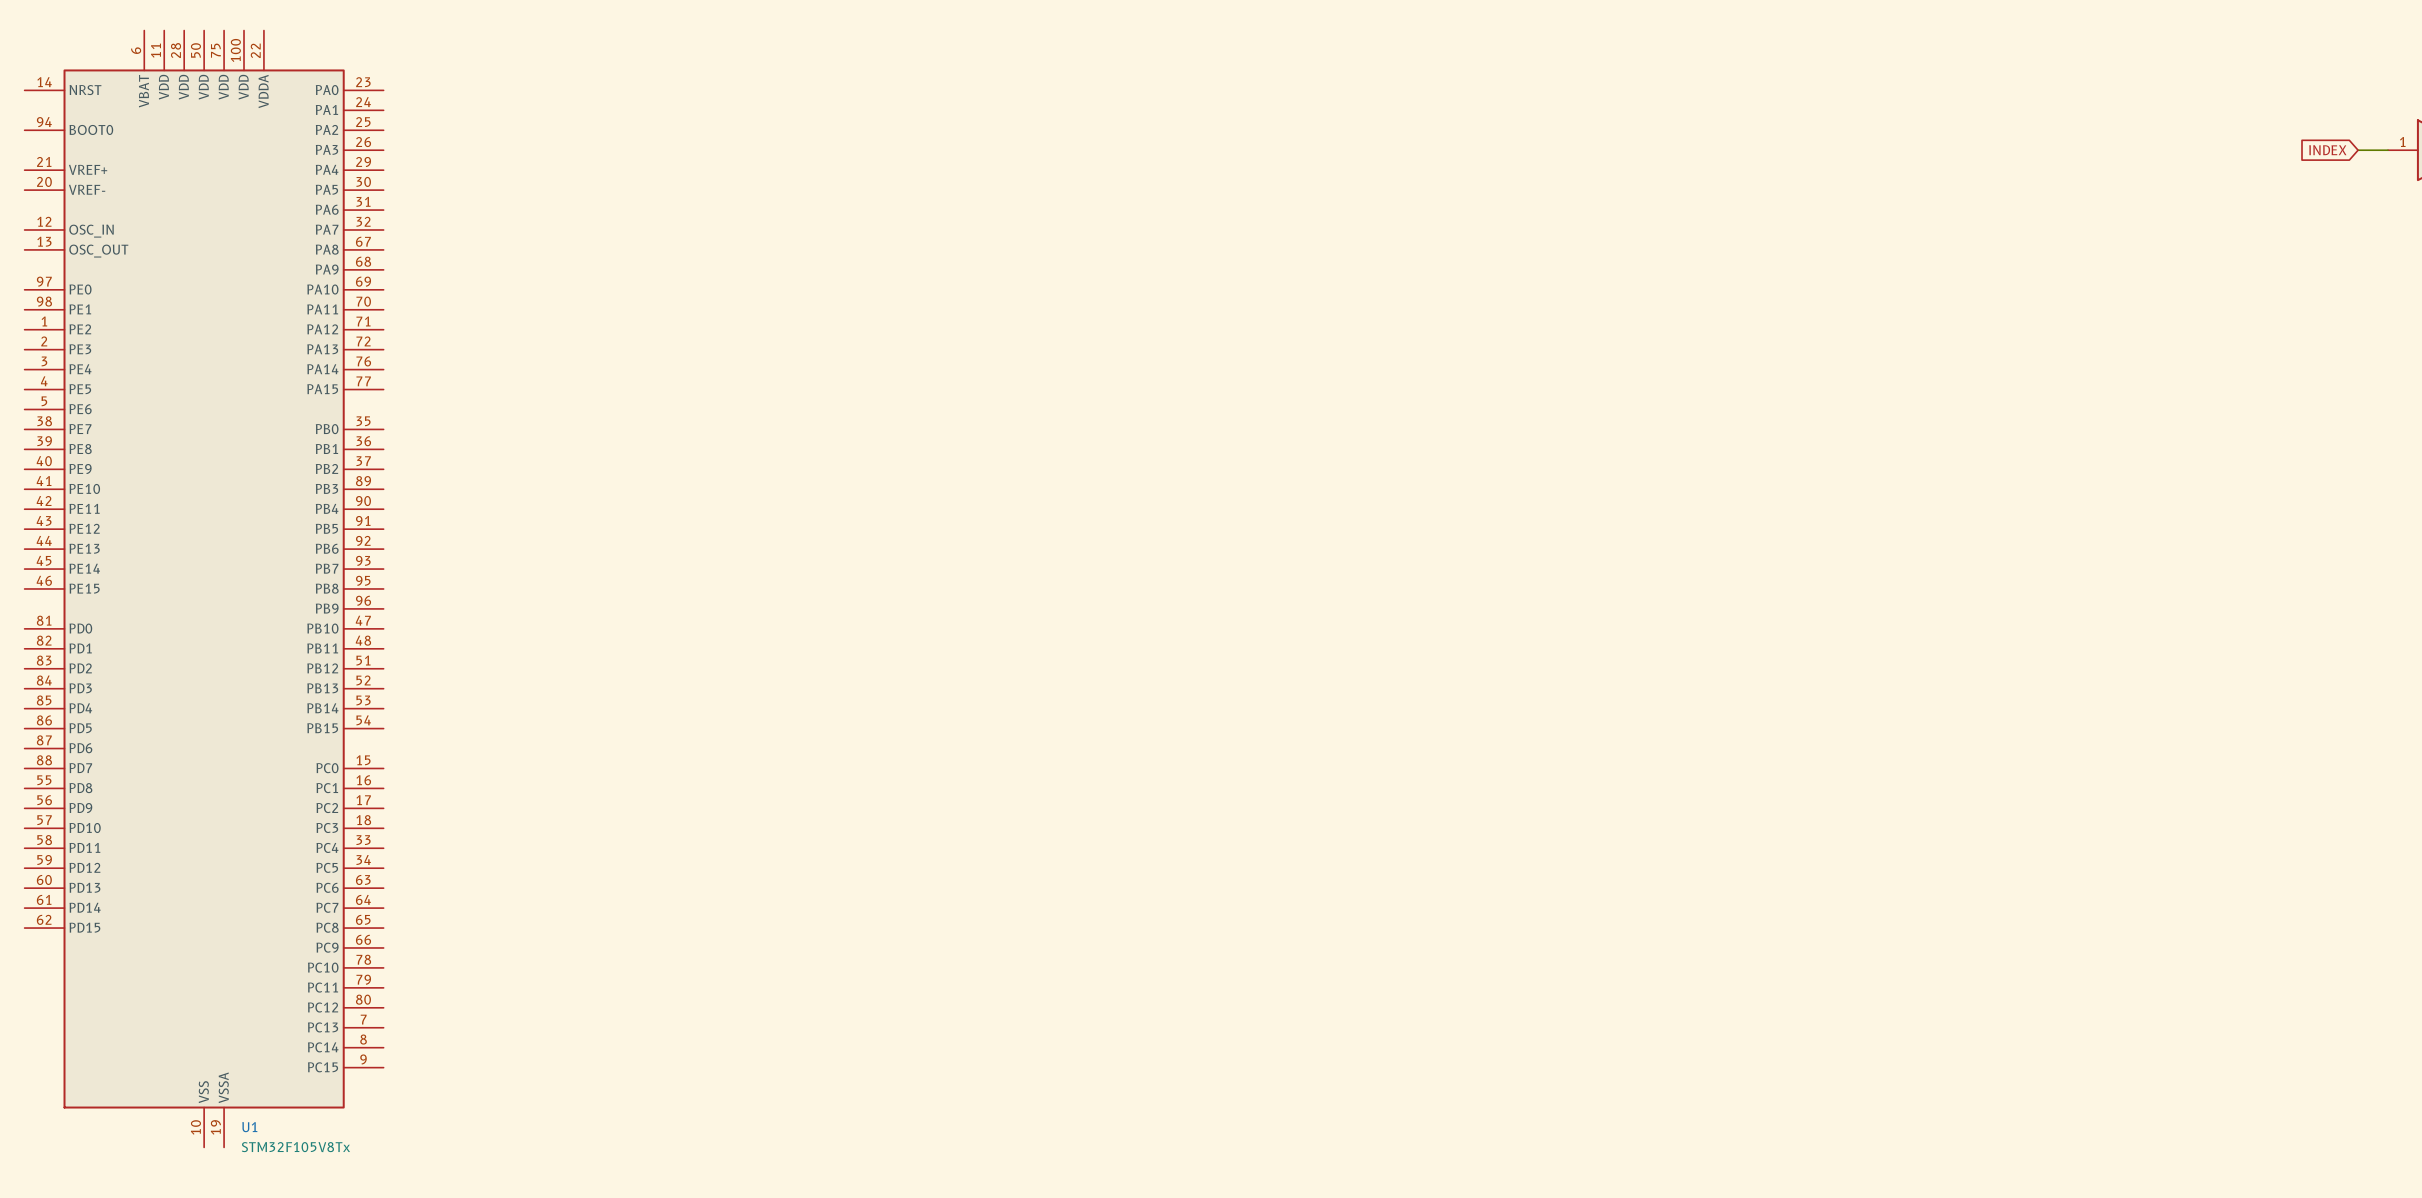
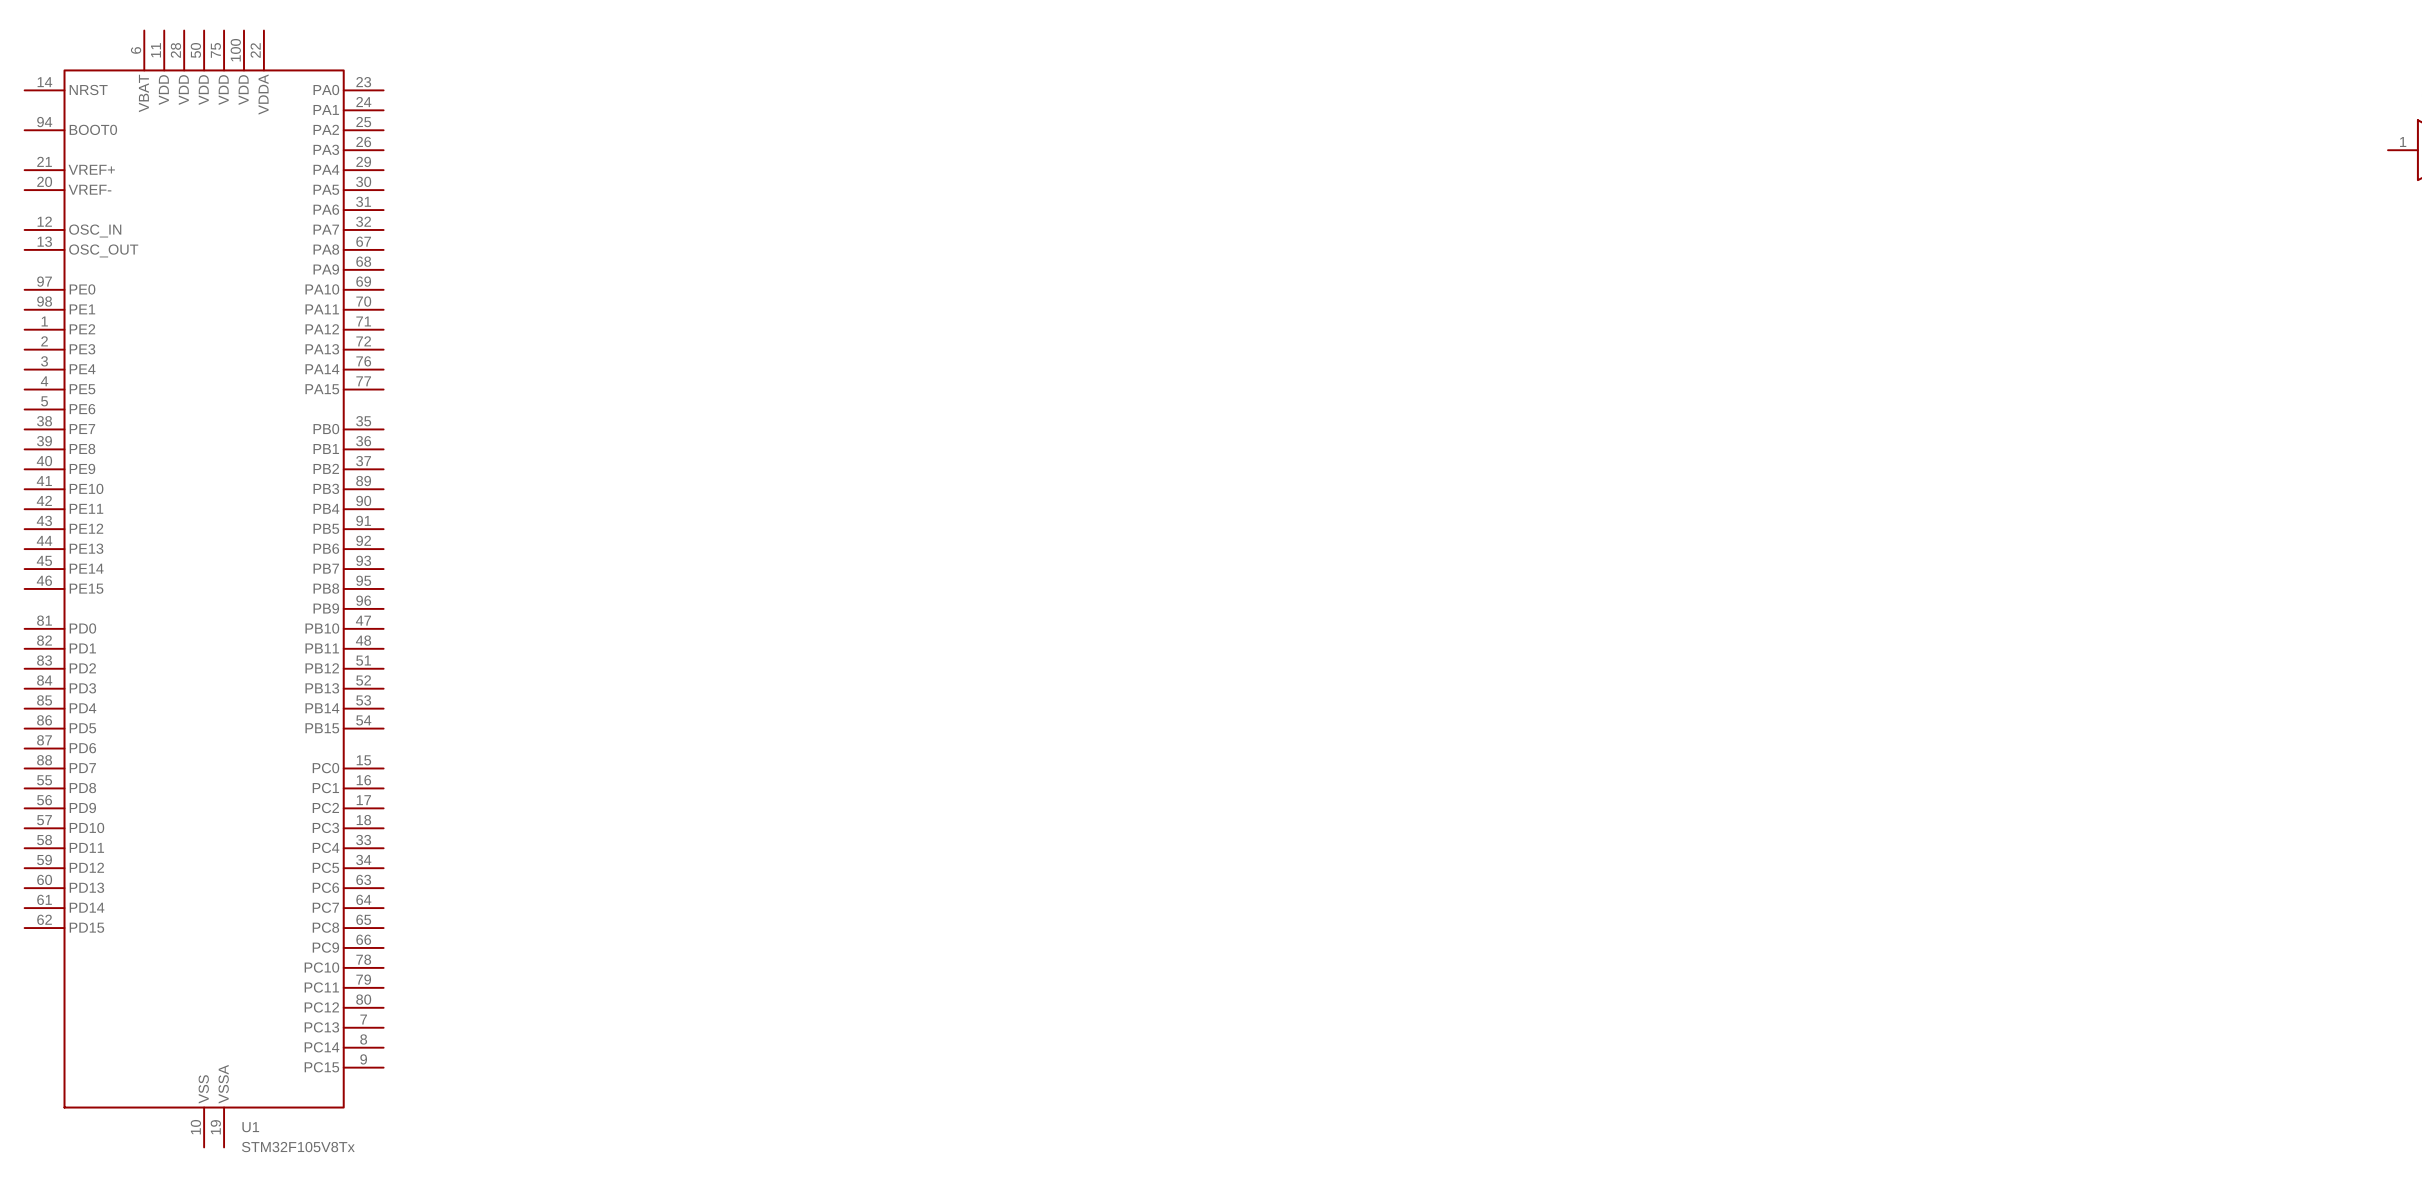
global label: INDEX (2327, 150) -> none
wire: (2358, 150) (2388, 150) -> none

